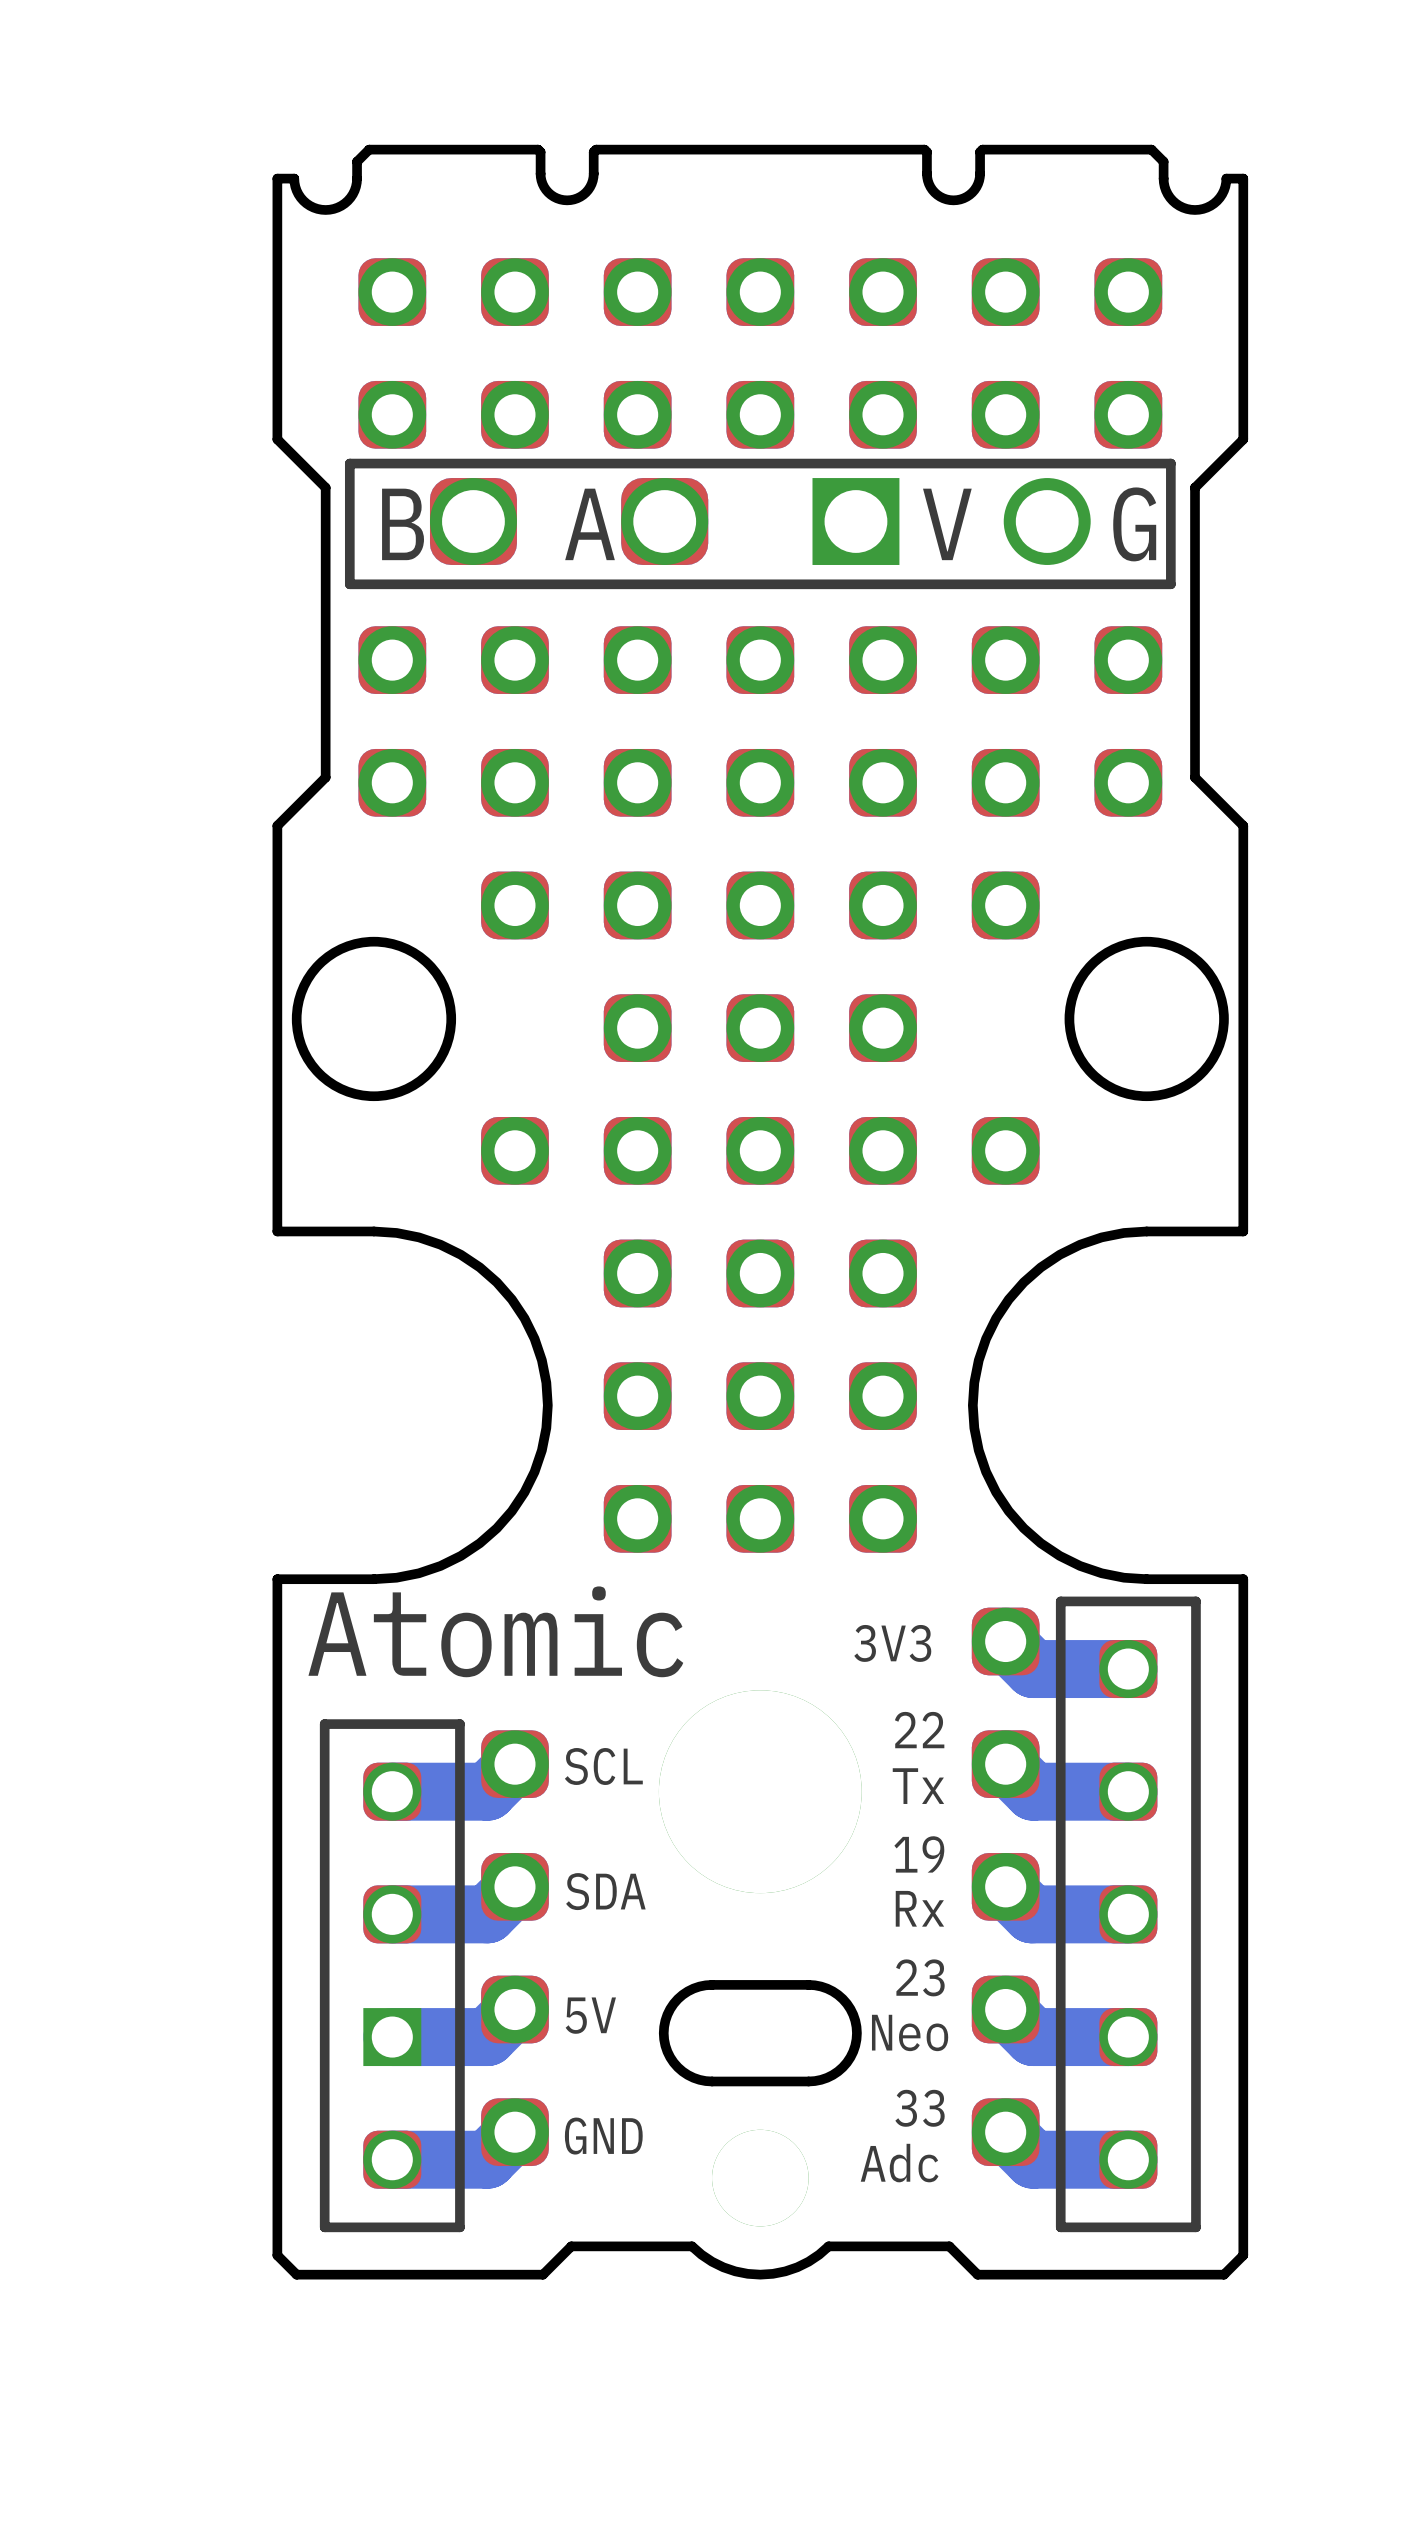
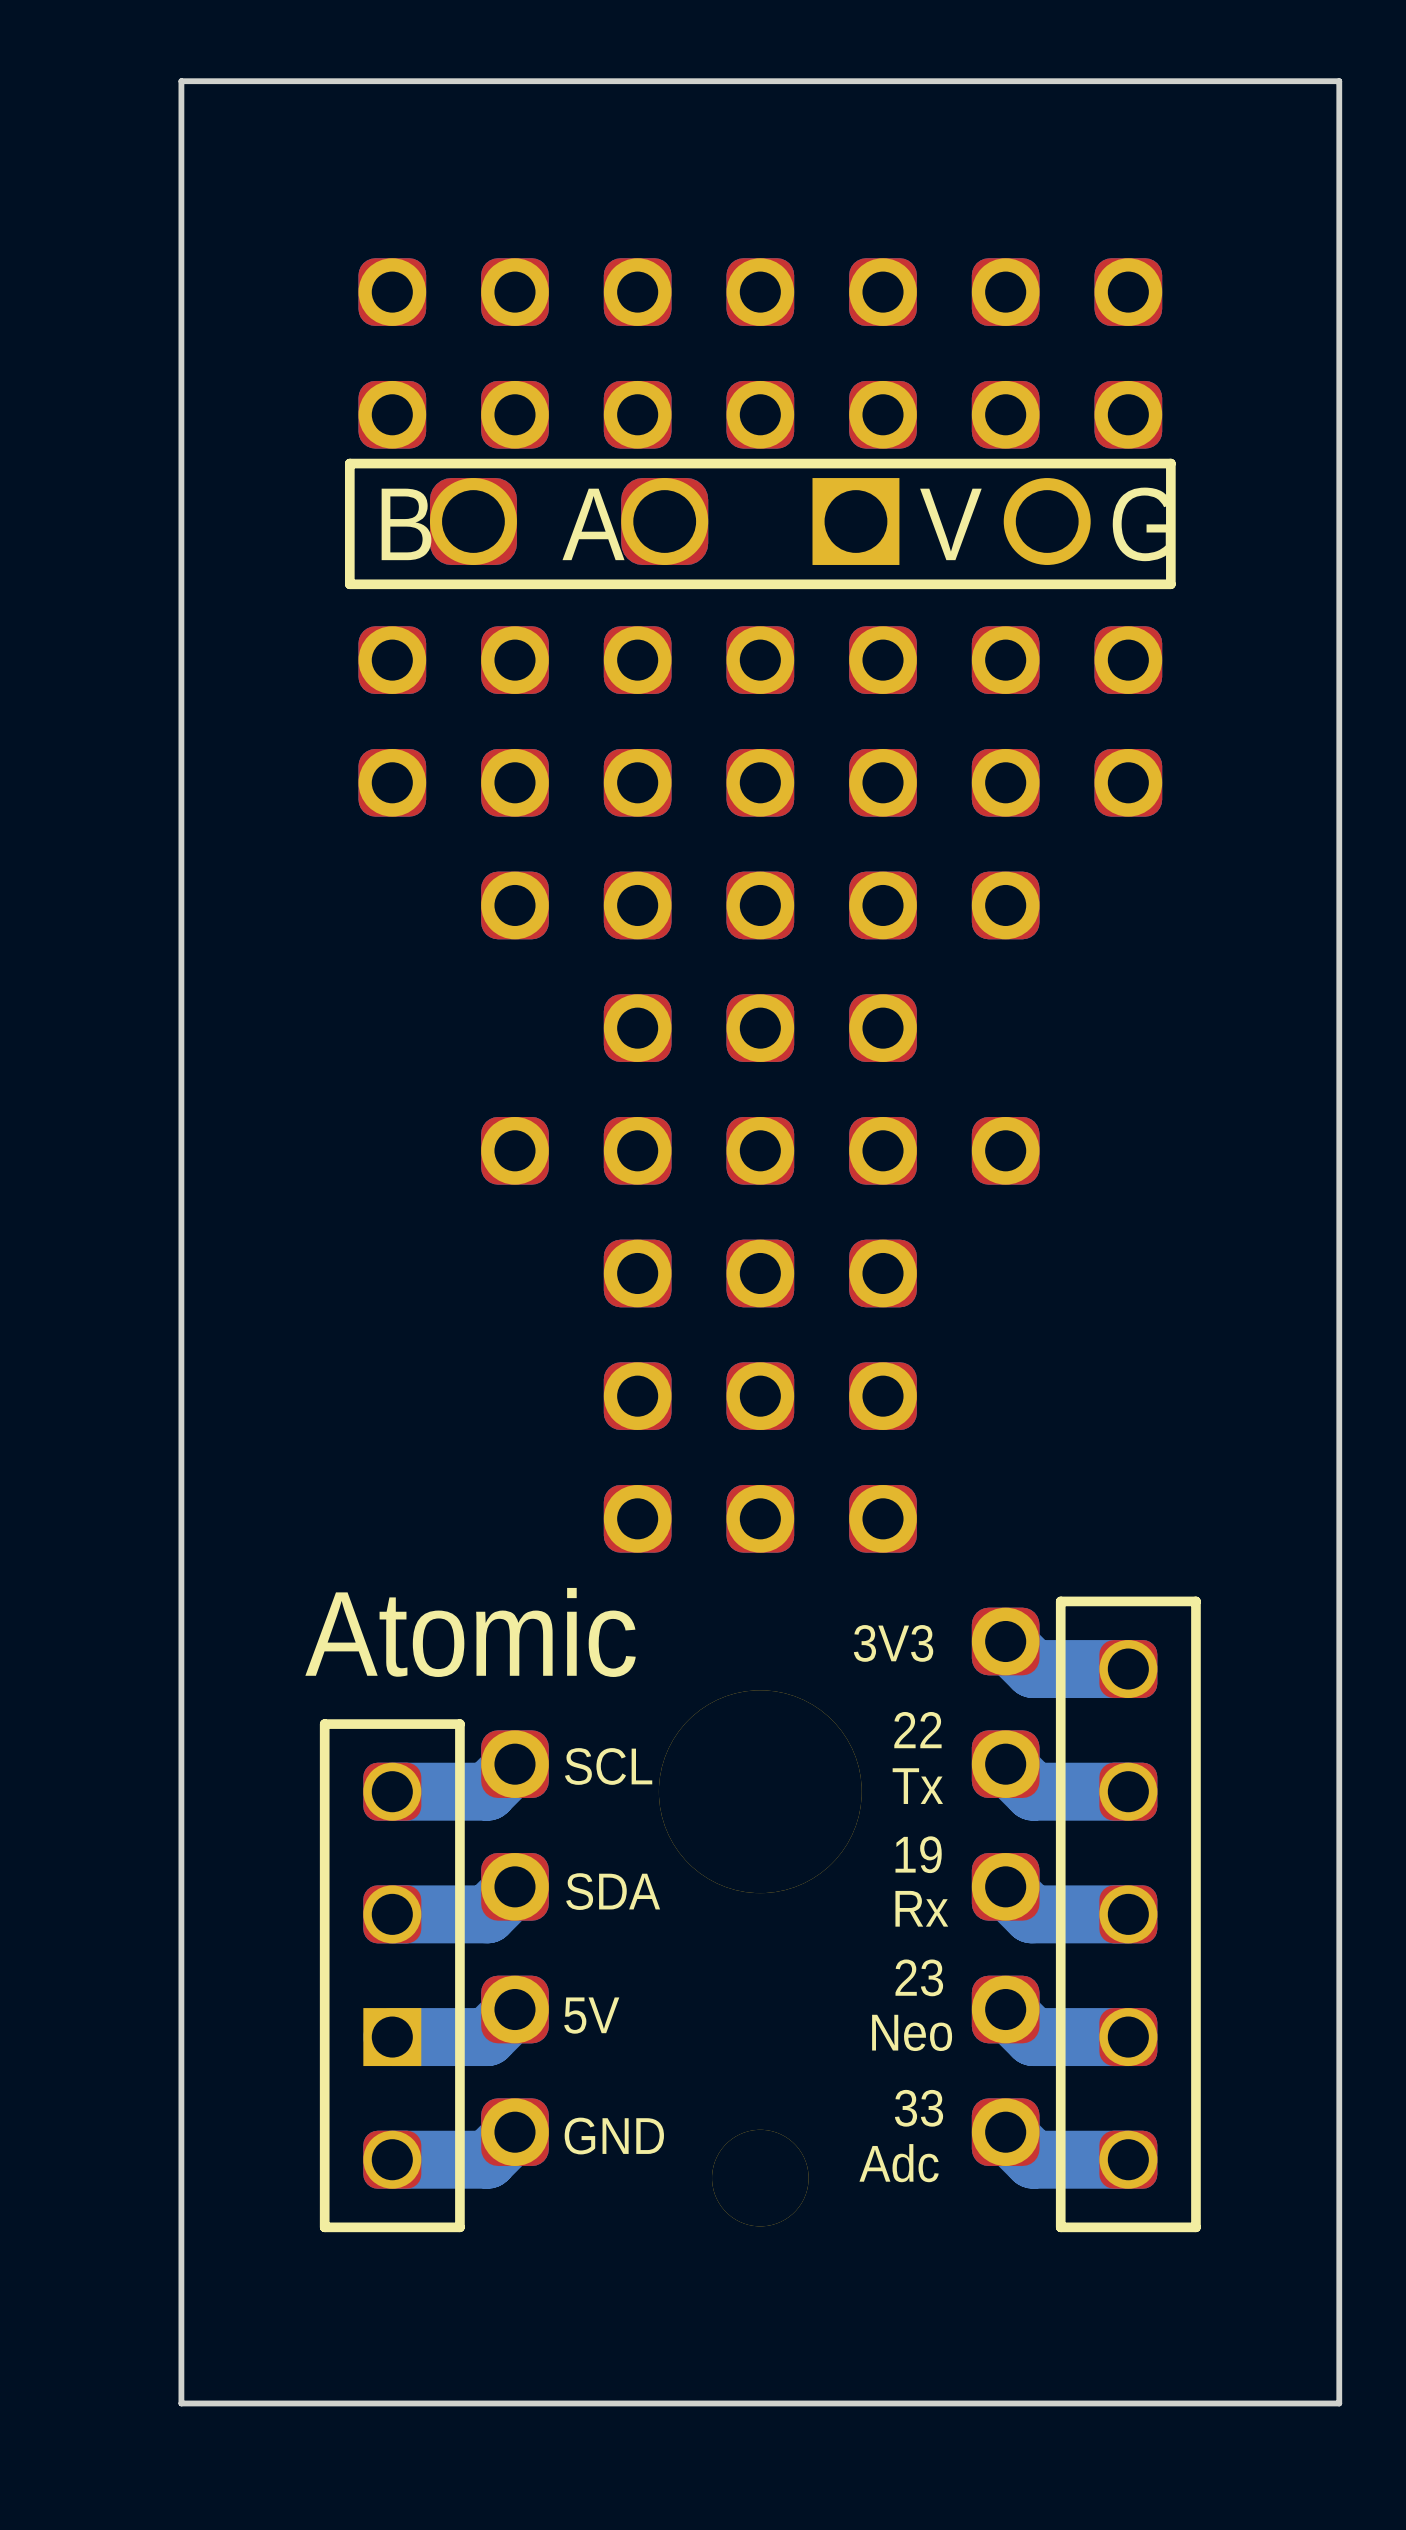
board edge: (369, 149) (357, 161) (356, 182) (352, 194) (344, 203) (333, 208) (321, 209) (309, 205) (298, 194) (294, 178) (277, 178) (277, 439) (325, 487) (325, 777) (277, 825) (277, 1231) (396, 1232) (440, 1244) (460, 1254) (496, 1282) (524, 1318) (541, 1360) (547, 1405) (541, 1450) (524, 1492) (496, 1528) (460, 1555) (440, 1565) (396, 1577) (277, 1579) (277, 2255) (296, 2274) (543, 2274) (571, 2246) (692, 2246) (701, 2254) (723, 2267) (735, 2271) (760, 2274) (785, 2271) (797, 2267) (819, 2254) (828, 2246) (949, 2246) (977, 2274) (1223, 2274) (1243, 2255) (1243, 1579) (1124, 1577) (1080, 1565) (1059, 1555) (1023, 1528) (996, 1492) (978, 1450) (972, 1405) (978, 1360) (996, 1318) (1023, 1282) (1059, 1254) (1080, 1244) (1124, 1232) (1243, 1231) (1243, 825) (1195, 777) (1195, 487) (1243, 439) (1243, 178) (1226, 178) (1222, 194) (1214, 203) (1203, 208) (1190, 209) (1175, 203) (1167, 194) (1163, 182) (1163, 161) (1151, 149) (982, 149) (980, 152) (979, 177) (976, 187) (966, 196) (953, 200) (940, 196) (930, 187) (927, 177) (926, 152) (924, 149) (596, 149) (593, 152) (593, 177) (590, 187) (580, 196) (567, 200) (553, 196) (544, 187) (540, 177) (540, 152) (538, 149) (369, 149) -> (181, 81) (181, 2403) (1339, 2403) (1339, 81) (181, 81)
round board edge: [291, 936, 457, 1102] -> none
round board edge: [1064, 936, 1229, 1102] -> none
board edge: (712, 1984) (808, 1984) (821, 1986) (832, 1991) (846, 2003) (855, 2020) (856, 2039) (850, 2057) (838, 2071) (827, 2077) (814, 2081) (712, 2081) (699, 2079) (687, 2075) (673, 2062) (667, 2051) (663, 2033) (665, 2020) (673, 2003) (682, 1994) (693, 1988) (712, 1984) -> none

